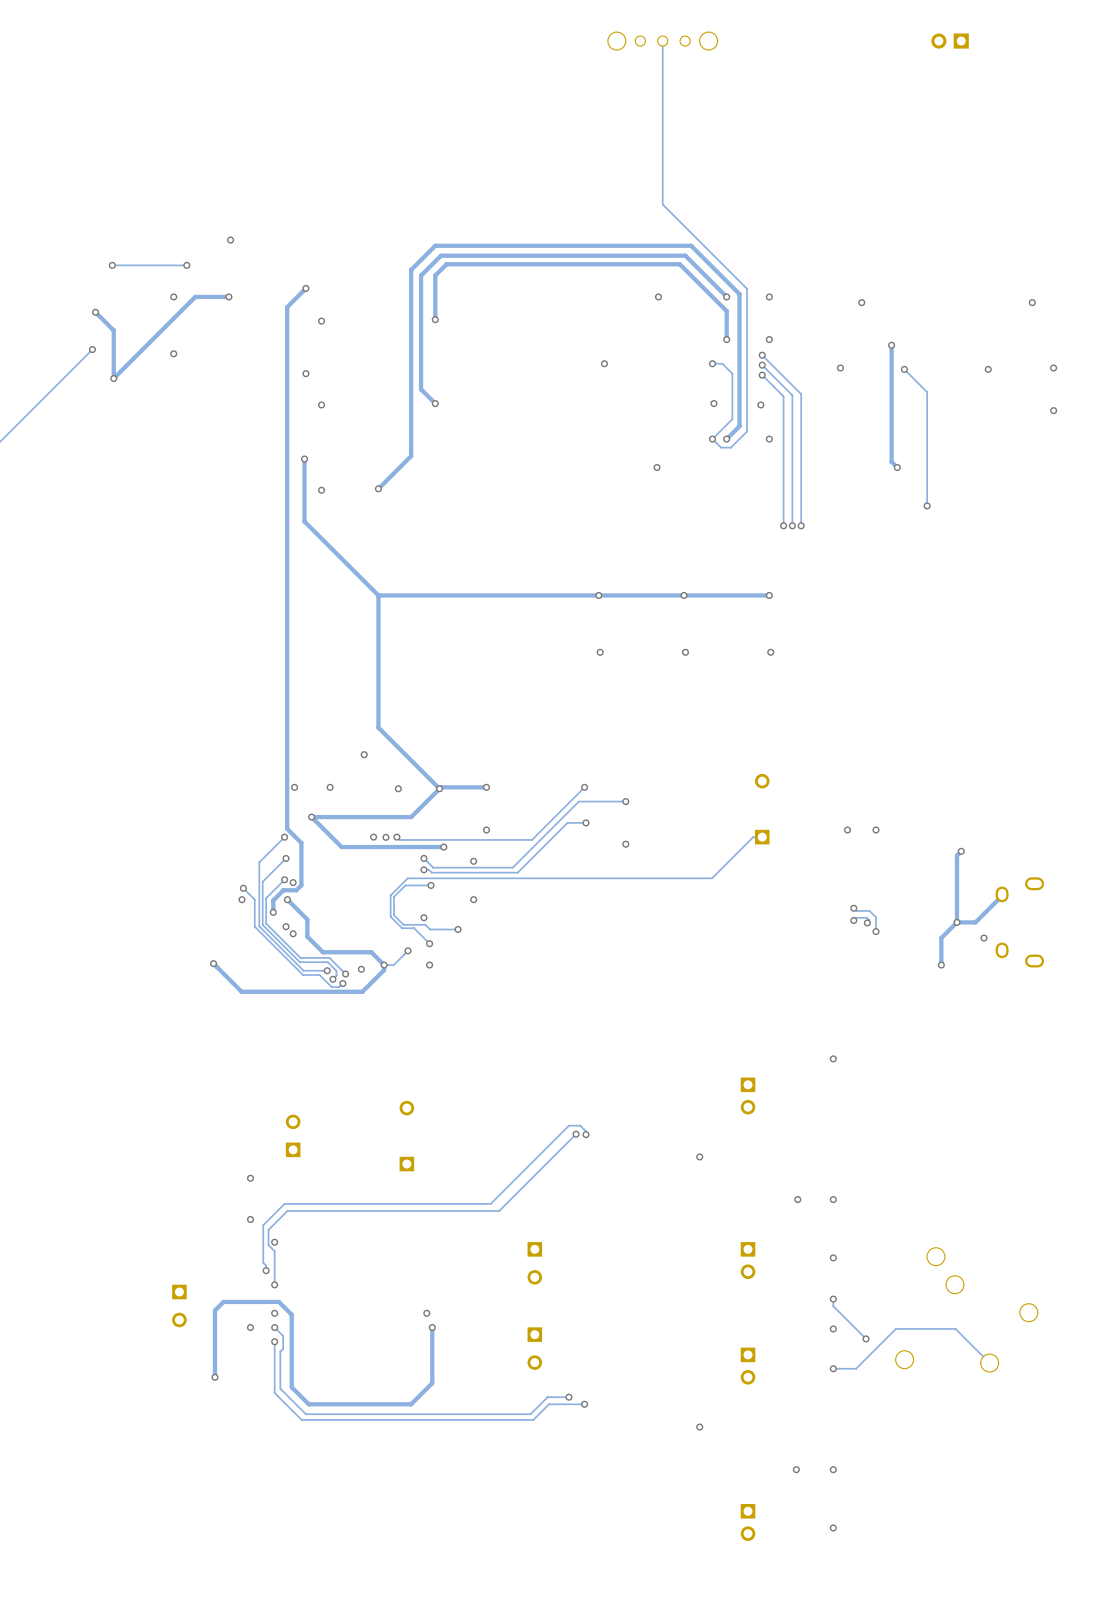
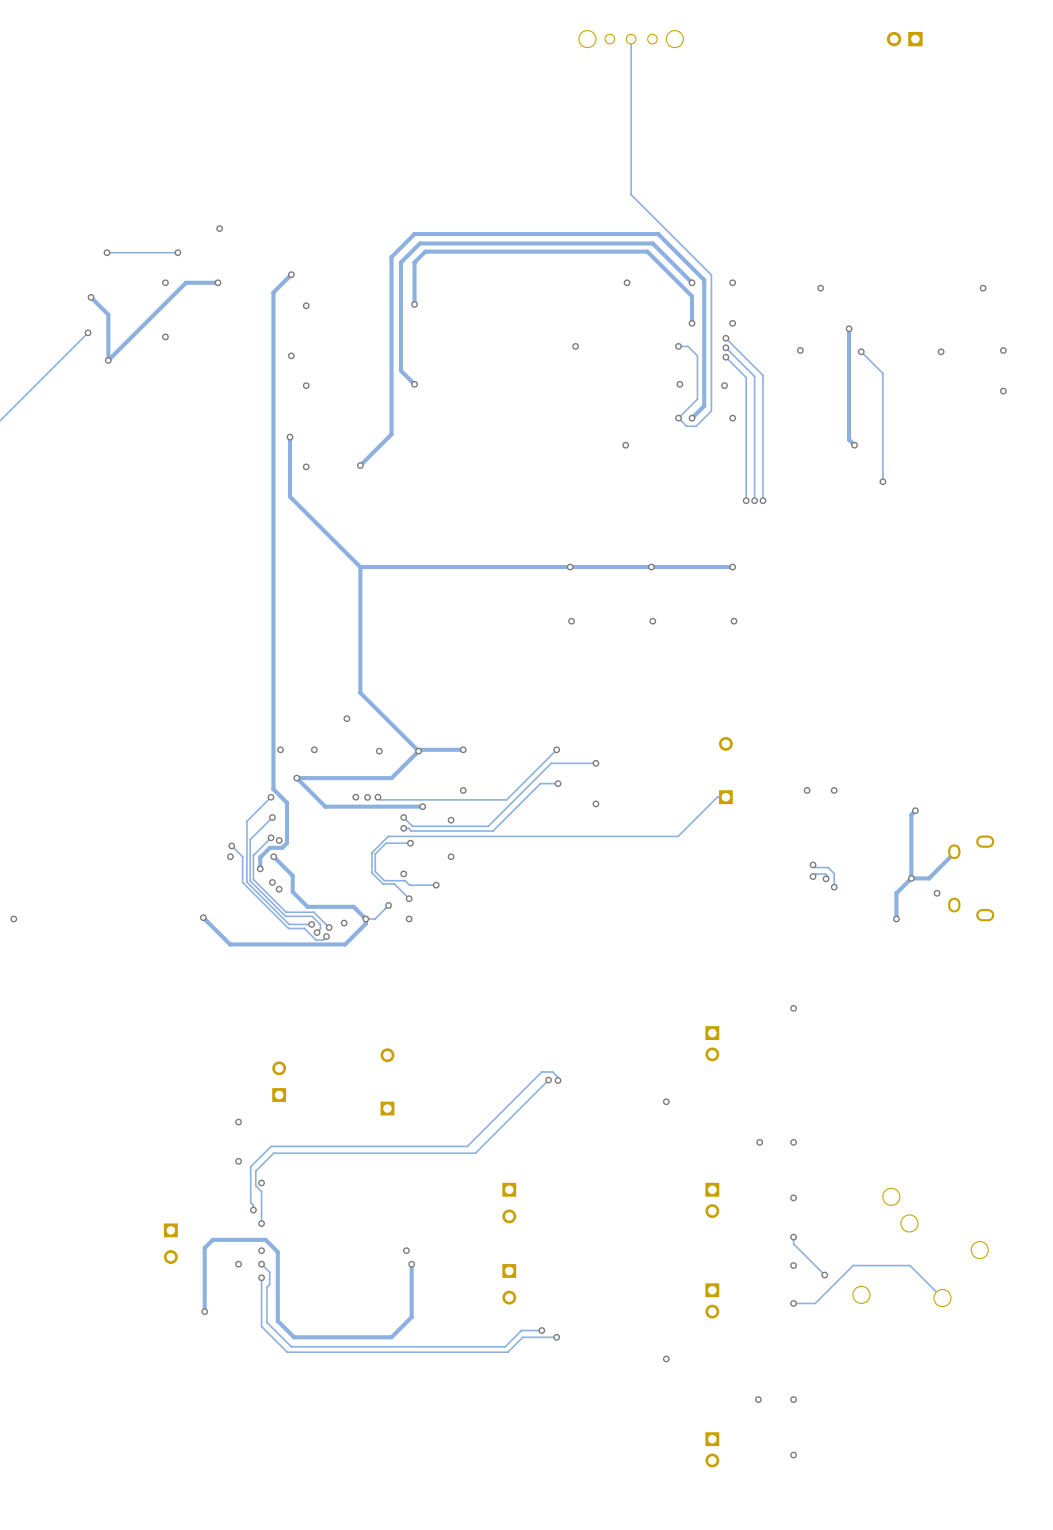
via: none -> (13, 919)

